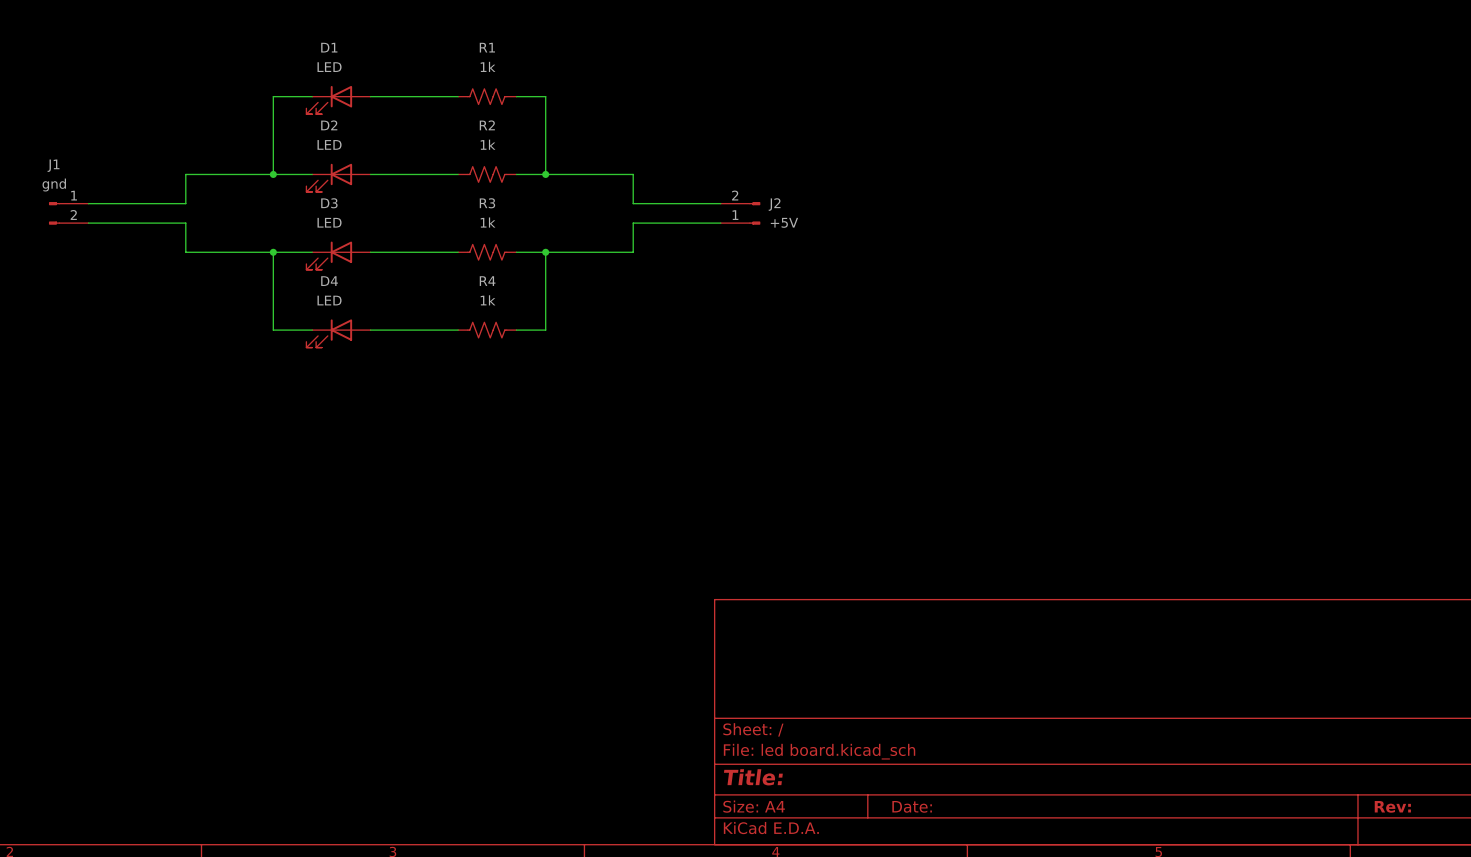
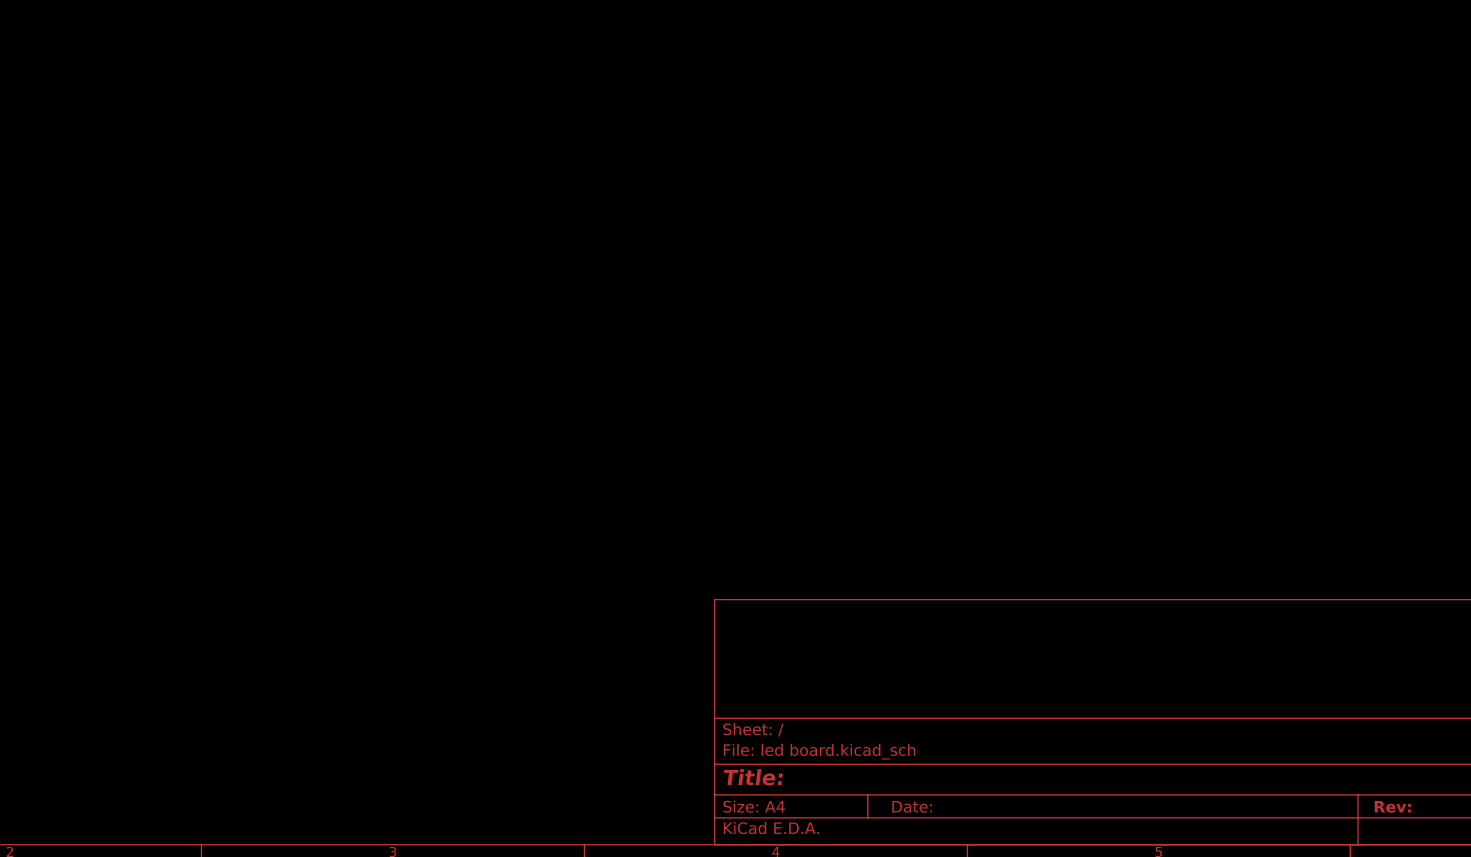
wire: (312, 96) (273, 96) (273, 174) -> none
wire: (370, 96) (458, 96) -> none
R1: 1k (487, 96) -> none
wire: (516, 96) (545, 96) (545, 174) -> none
D1: LED (338, 100) -> none
junction: (273, 174) -> none
wire: (312, 174) (185, 174) (185, 203) (88, 203) -> none
wire: (370, 174) (458, 174) -> none
R2: 1k (487, 174) -> none
wire: (516, 174) (633, 174) (633, 203) (720, 203) -> none
junction: (545, 174) -> none
D2: LED (338, 177) -> none
J1: gnd (68, 213) -> none
J2: +5V (740, 213) -> none
wire: (88, 223) (185, 223) (185, 252) (312, 252) -> none
wire: (720, 223) (633, 223) (633, 252) (516, 252) -> none
wire: (273, 252) (273, 330) (312, 330) -> none
junction: (273, 252) -> none
wire: (370, 252) (458, 252) -> none
R3: 1k (487, 252) -> none
wire: (545, 252) (545, 330) (516, 330) -> none
junction: (545, 252) -> none
D3: LED (338, 255) -> none
wire: (370, 330) (458, 330) -> none
R4: 1k (487, 330) -> none
D4: LED (338, 333) -> none

